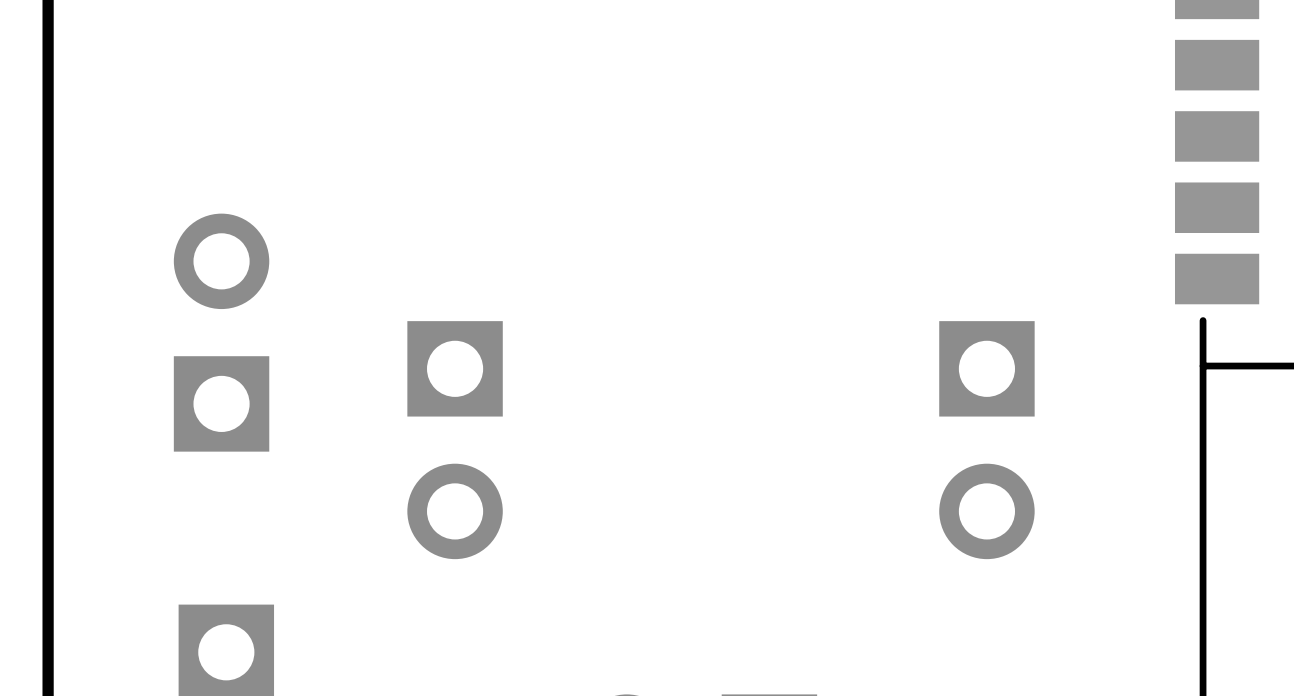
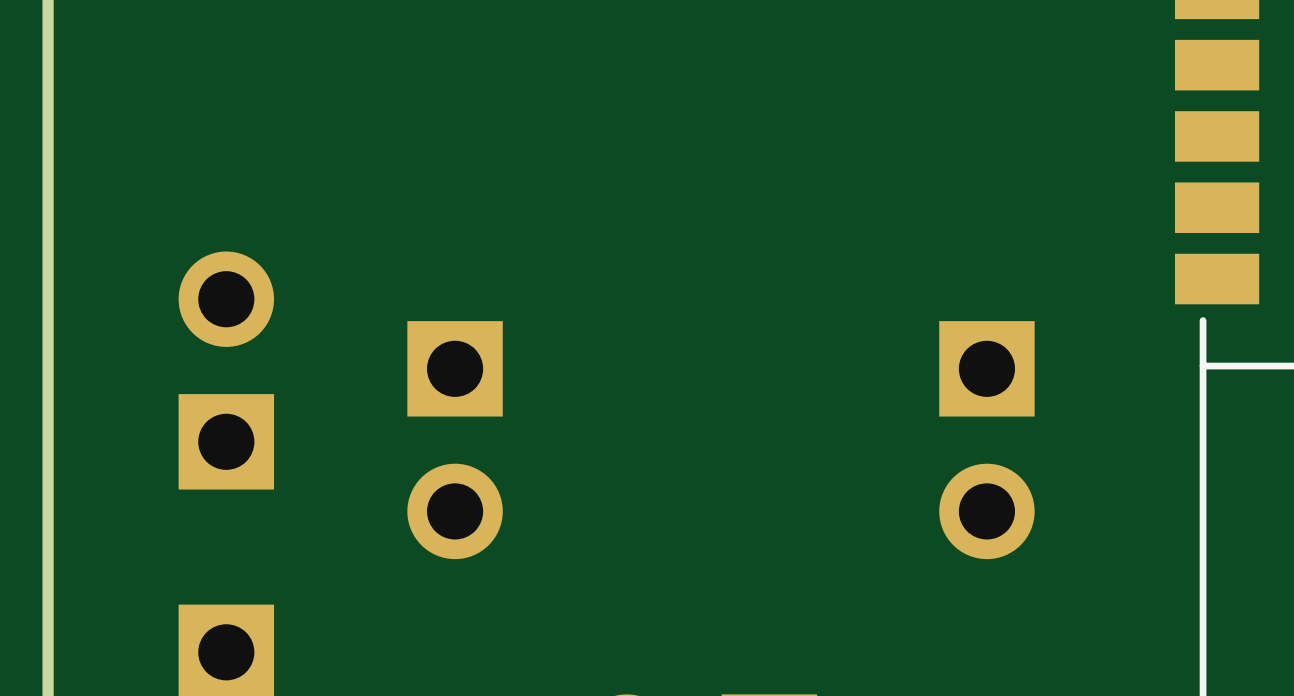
part position: (221, 332) -> (226, 370)

